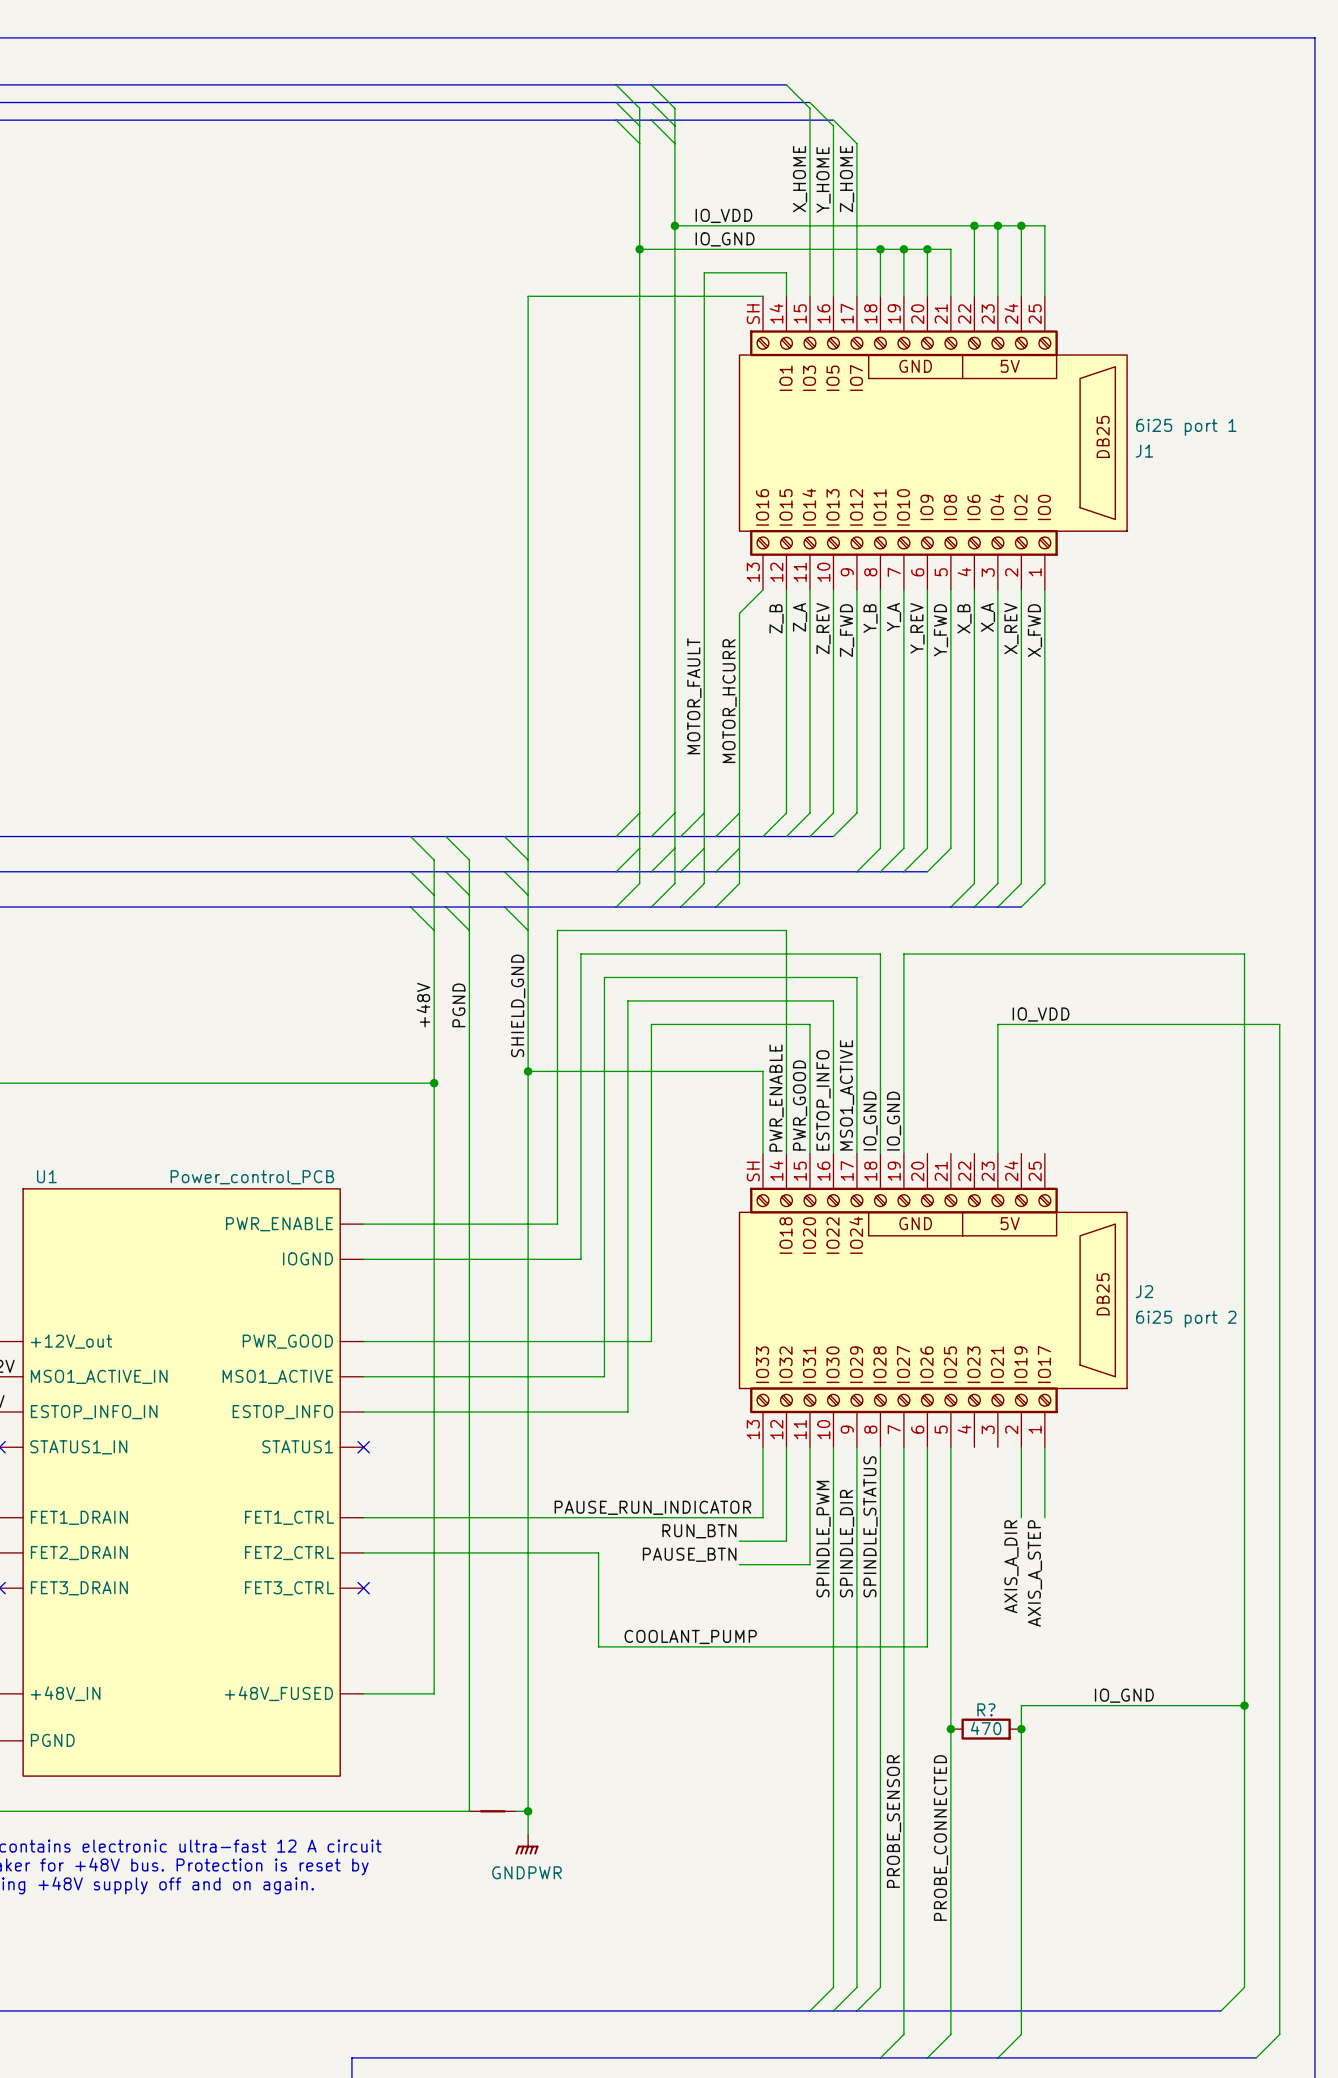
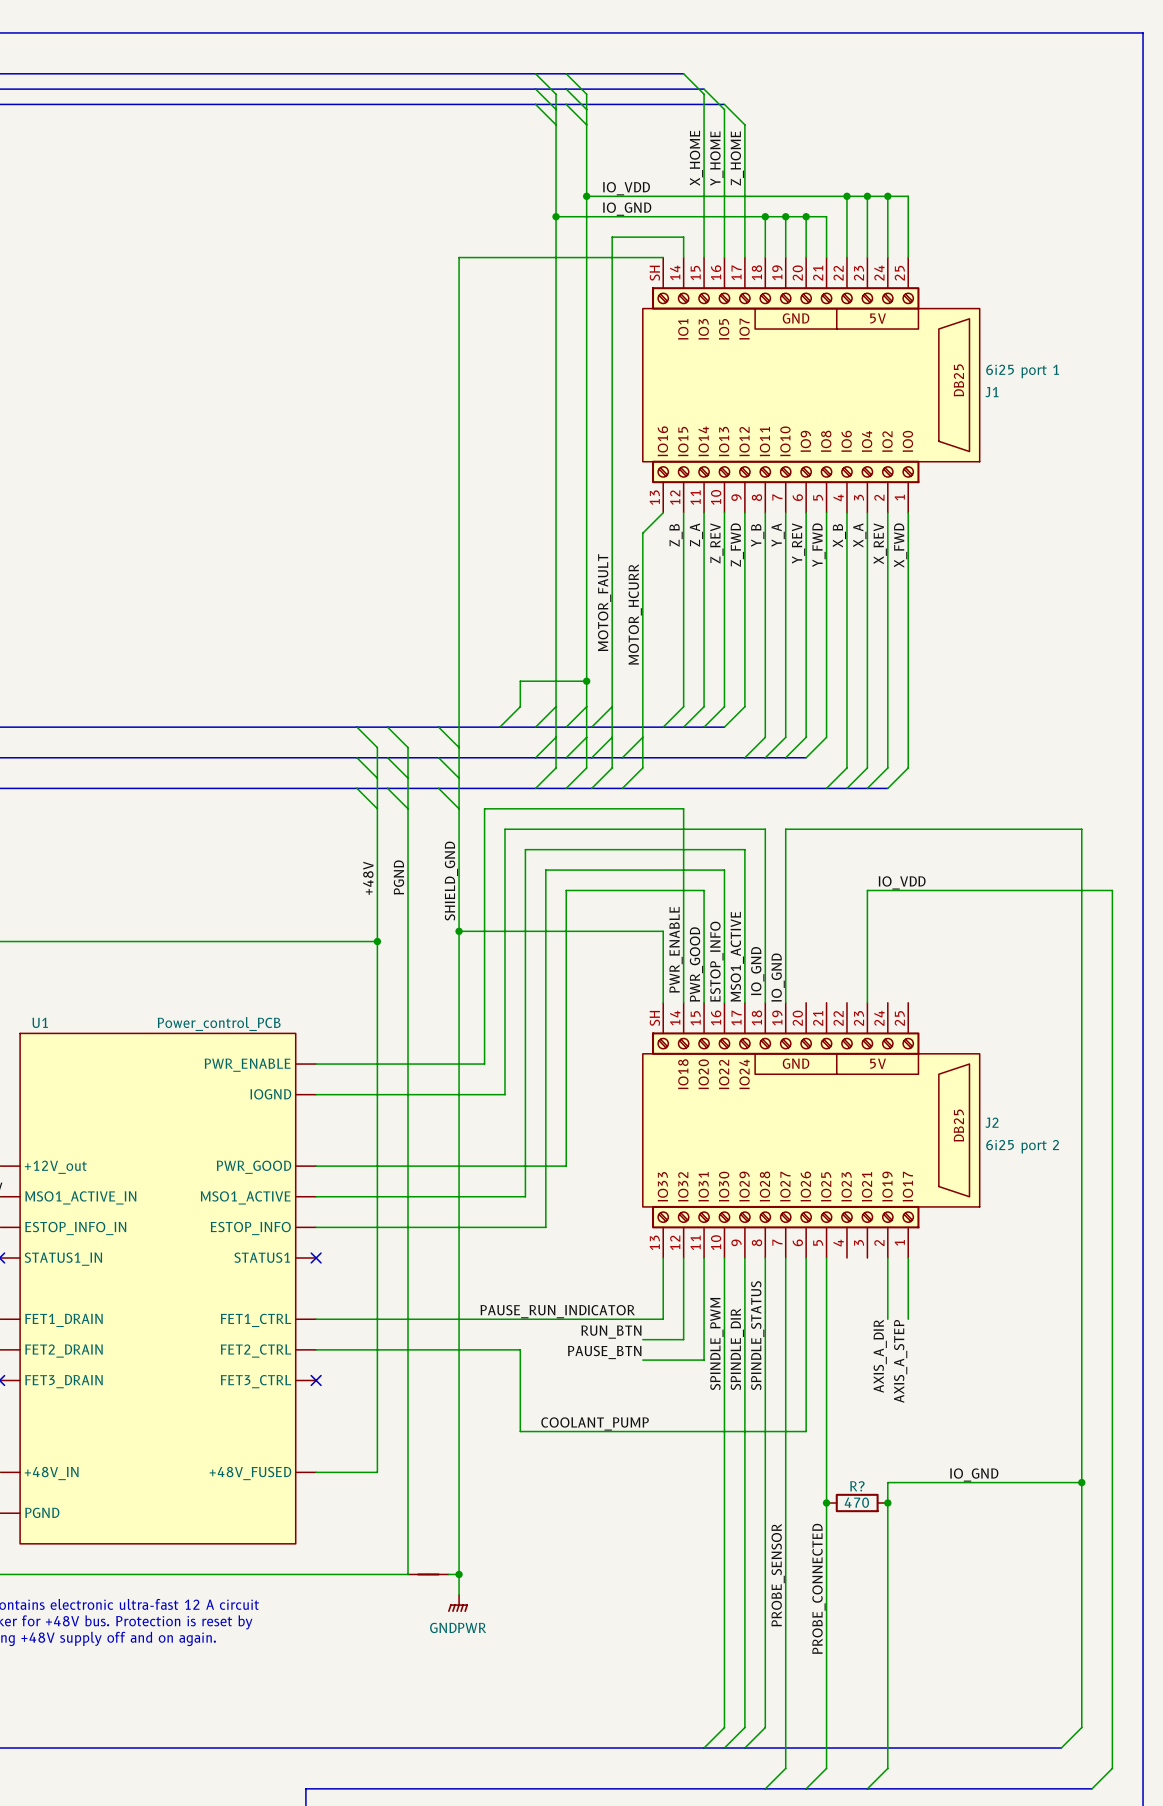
wire: none -> (586, 681) (520, 681) (520, 706) (499, 727)
junction: none -> (586, 681)
wire: (739, 813) (716, 836) -> none

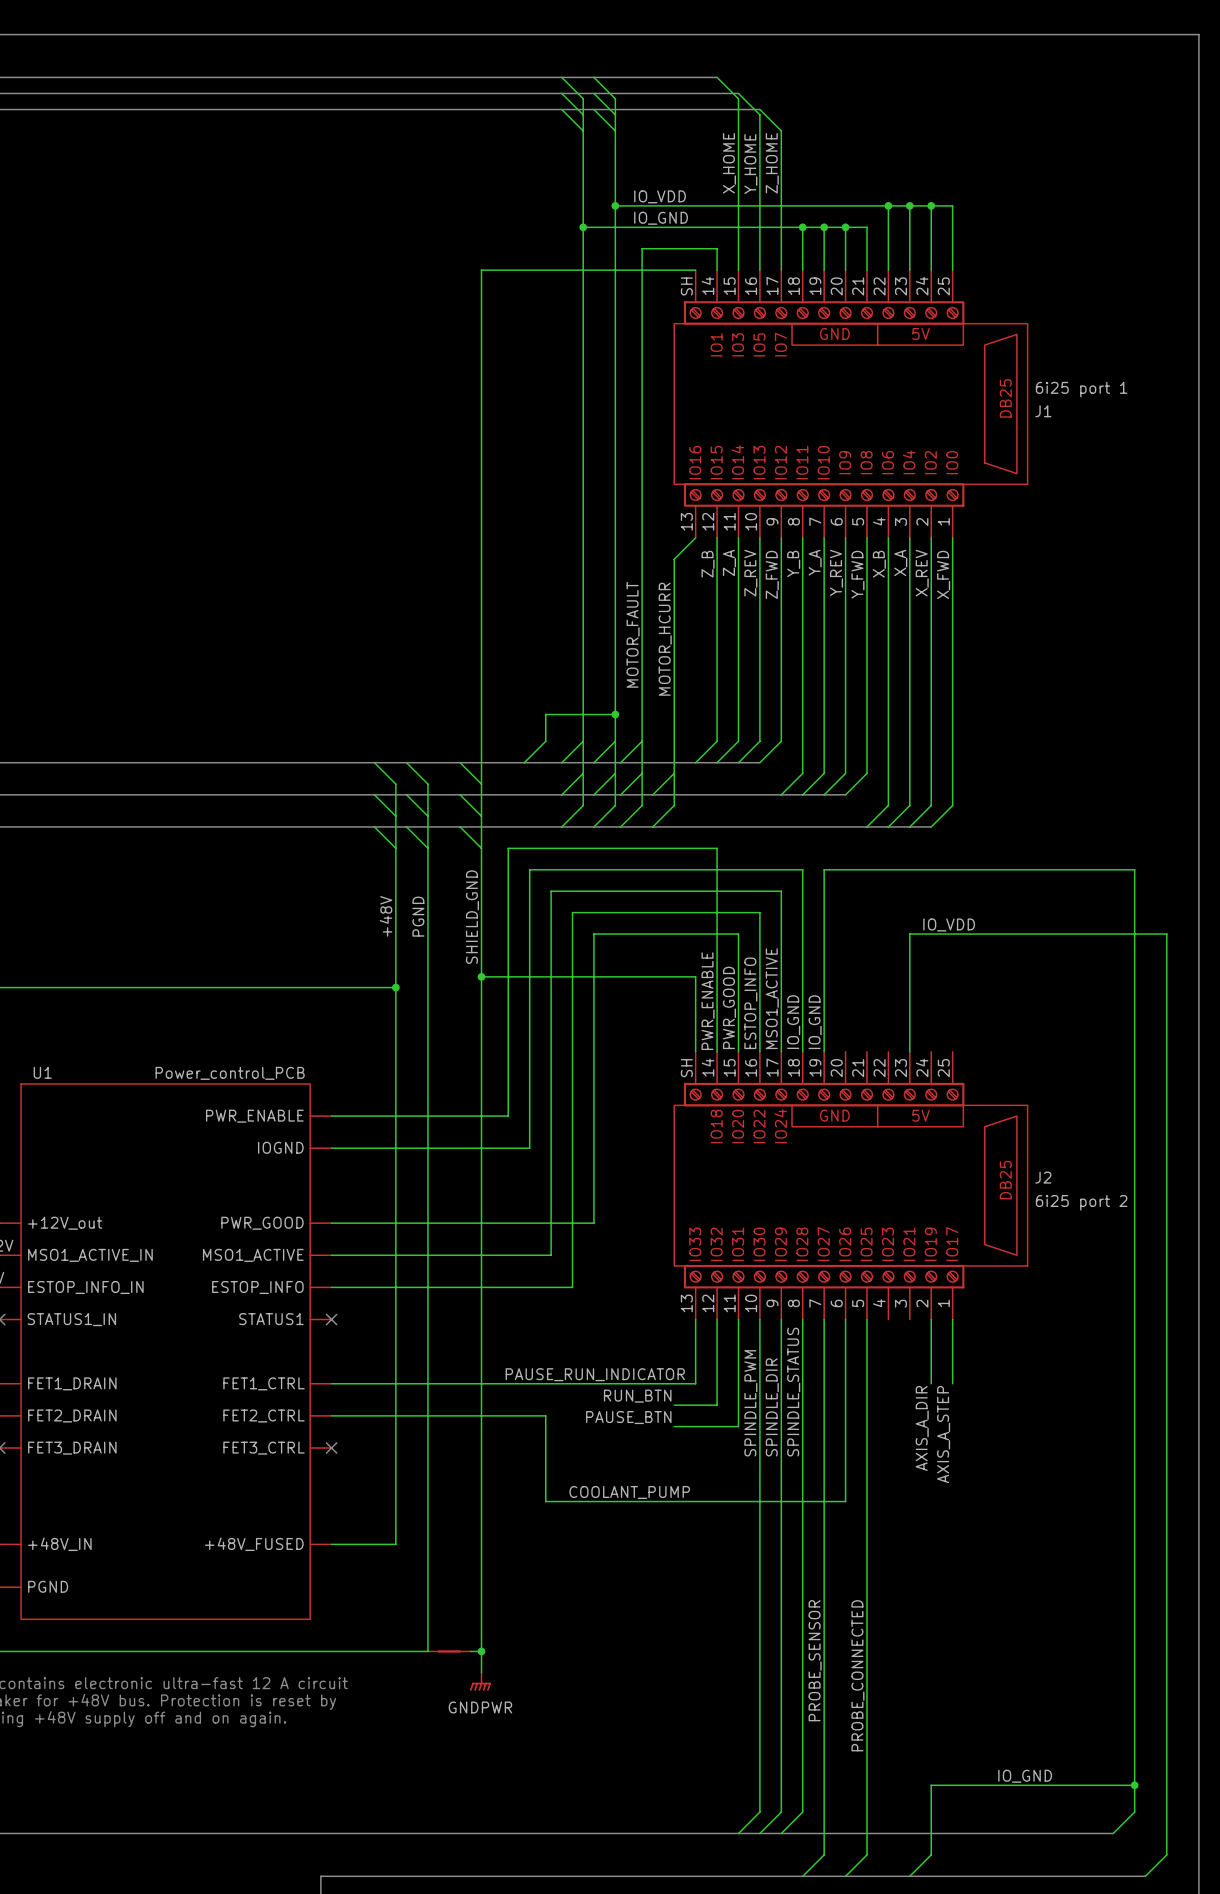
label: IO_GND (974, 1475) -> none
wire: (1081, 1482) (887, 1482) (887, 1702) -> (1134, 1785) (931, 1785)
junction: (1081, 1482) -> none
junction: (826, 1503) -> none
R?: 470 (857, 1503) -> none
junction: (887, 1503) -> none
label: none -> IO_GND (1025, 1776)
junction: none -> (1134, 1785)

